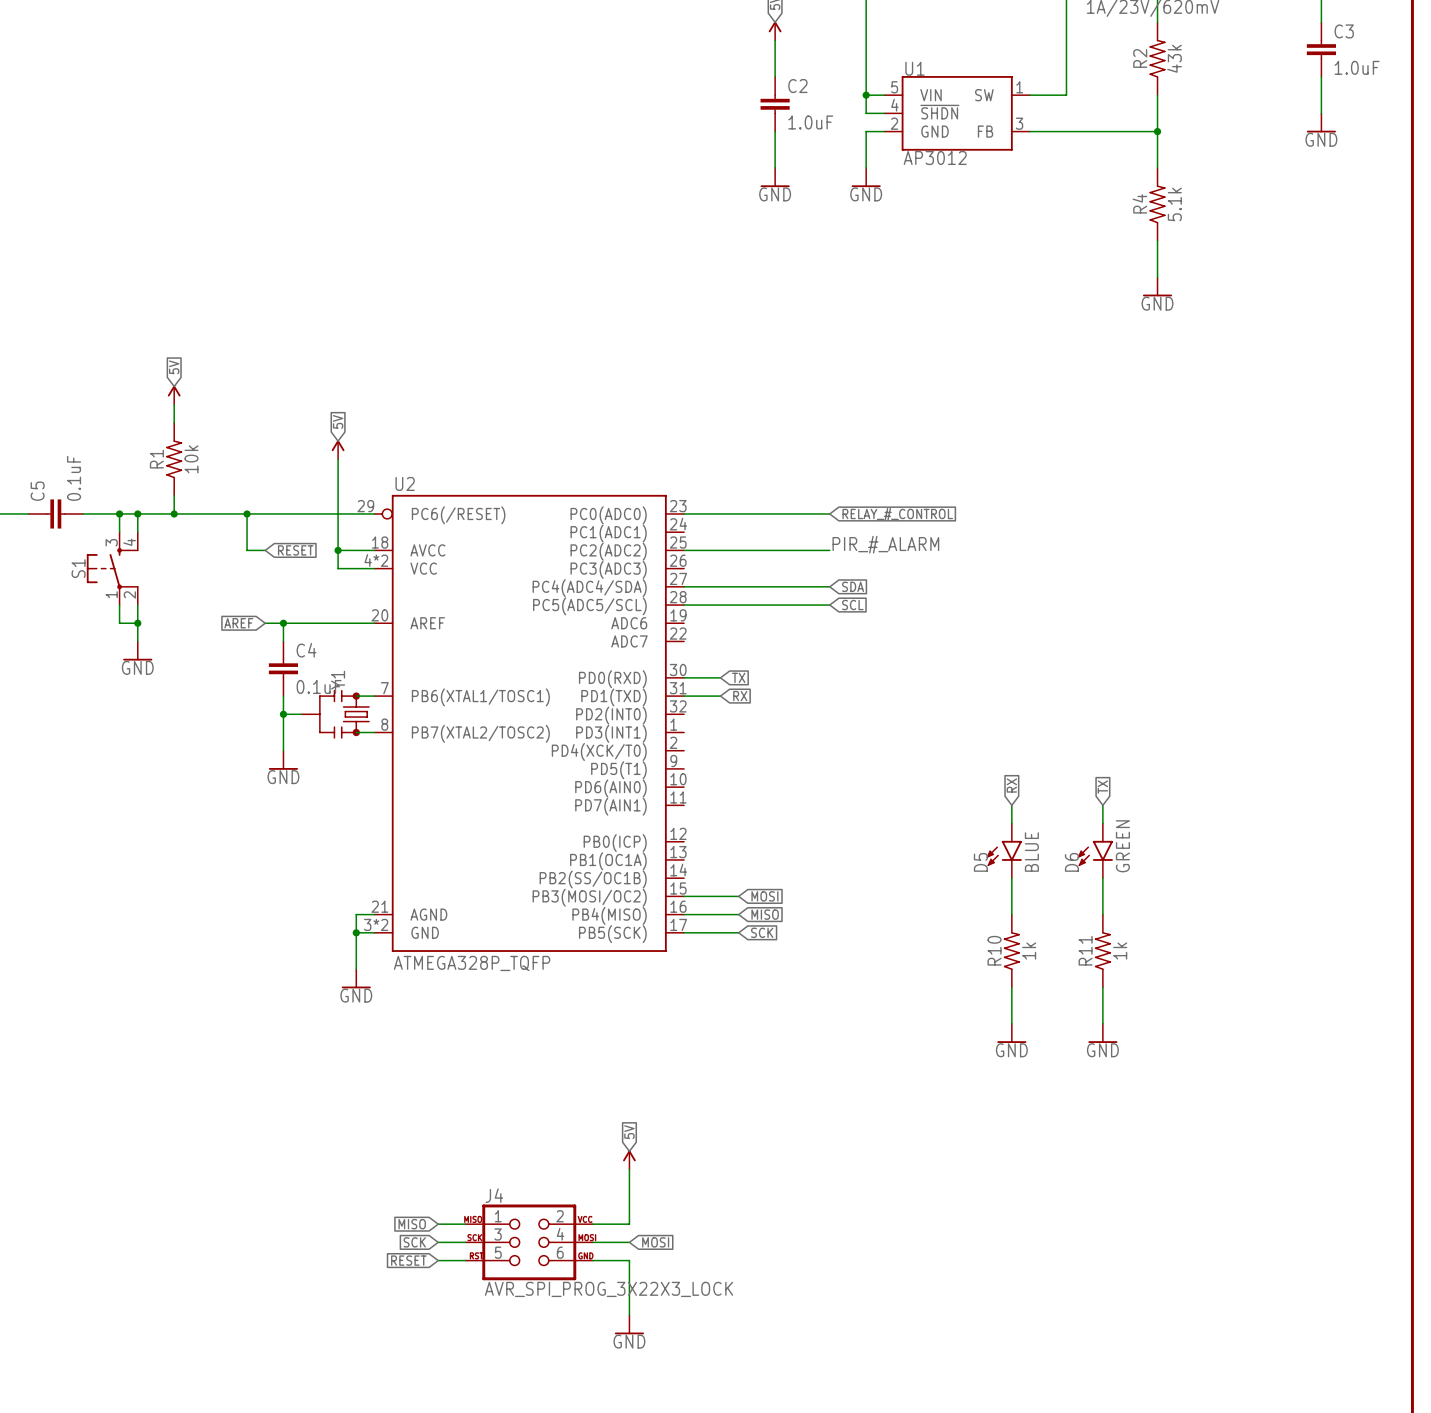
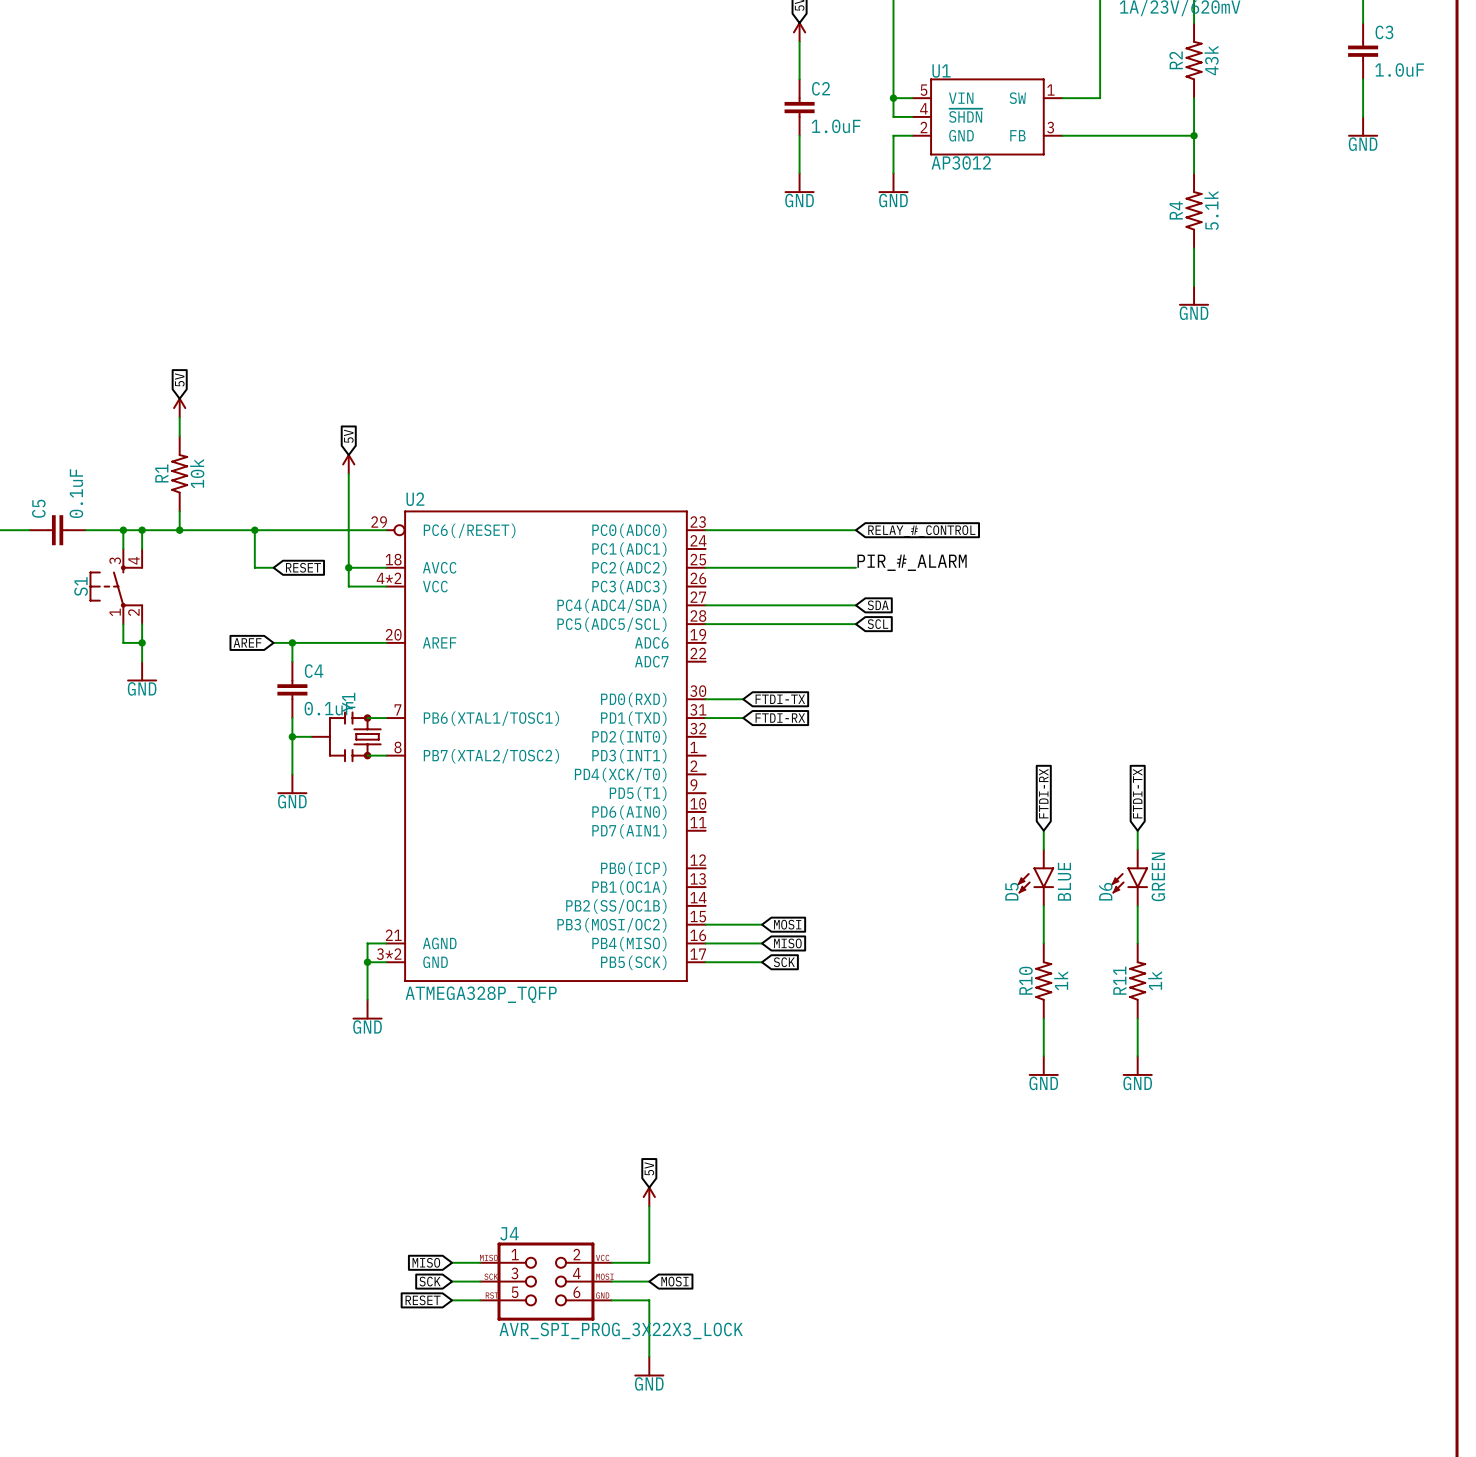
global label: TX (738, 677) -> FTDI-TX (780, 699)
global label: RX (740, 696) -> FTDI-RX (780, 718)
global label: RX (1011, 785) -> FTDI-RX (1043, 793)
global label: TX (1102, 787) -> FTDI-TX (1137, 793)

